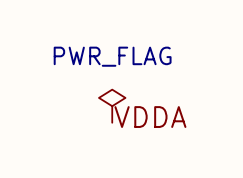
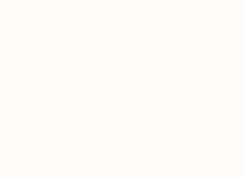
power symbol: PWR_FLAG (112, 106) -> none
label: VDDA (150, 117) -> none

